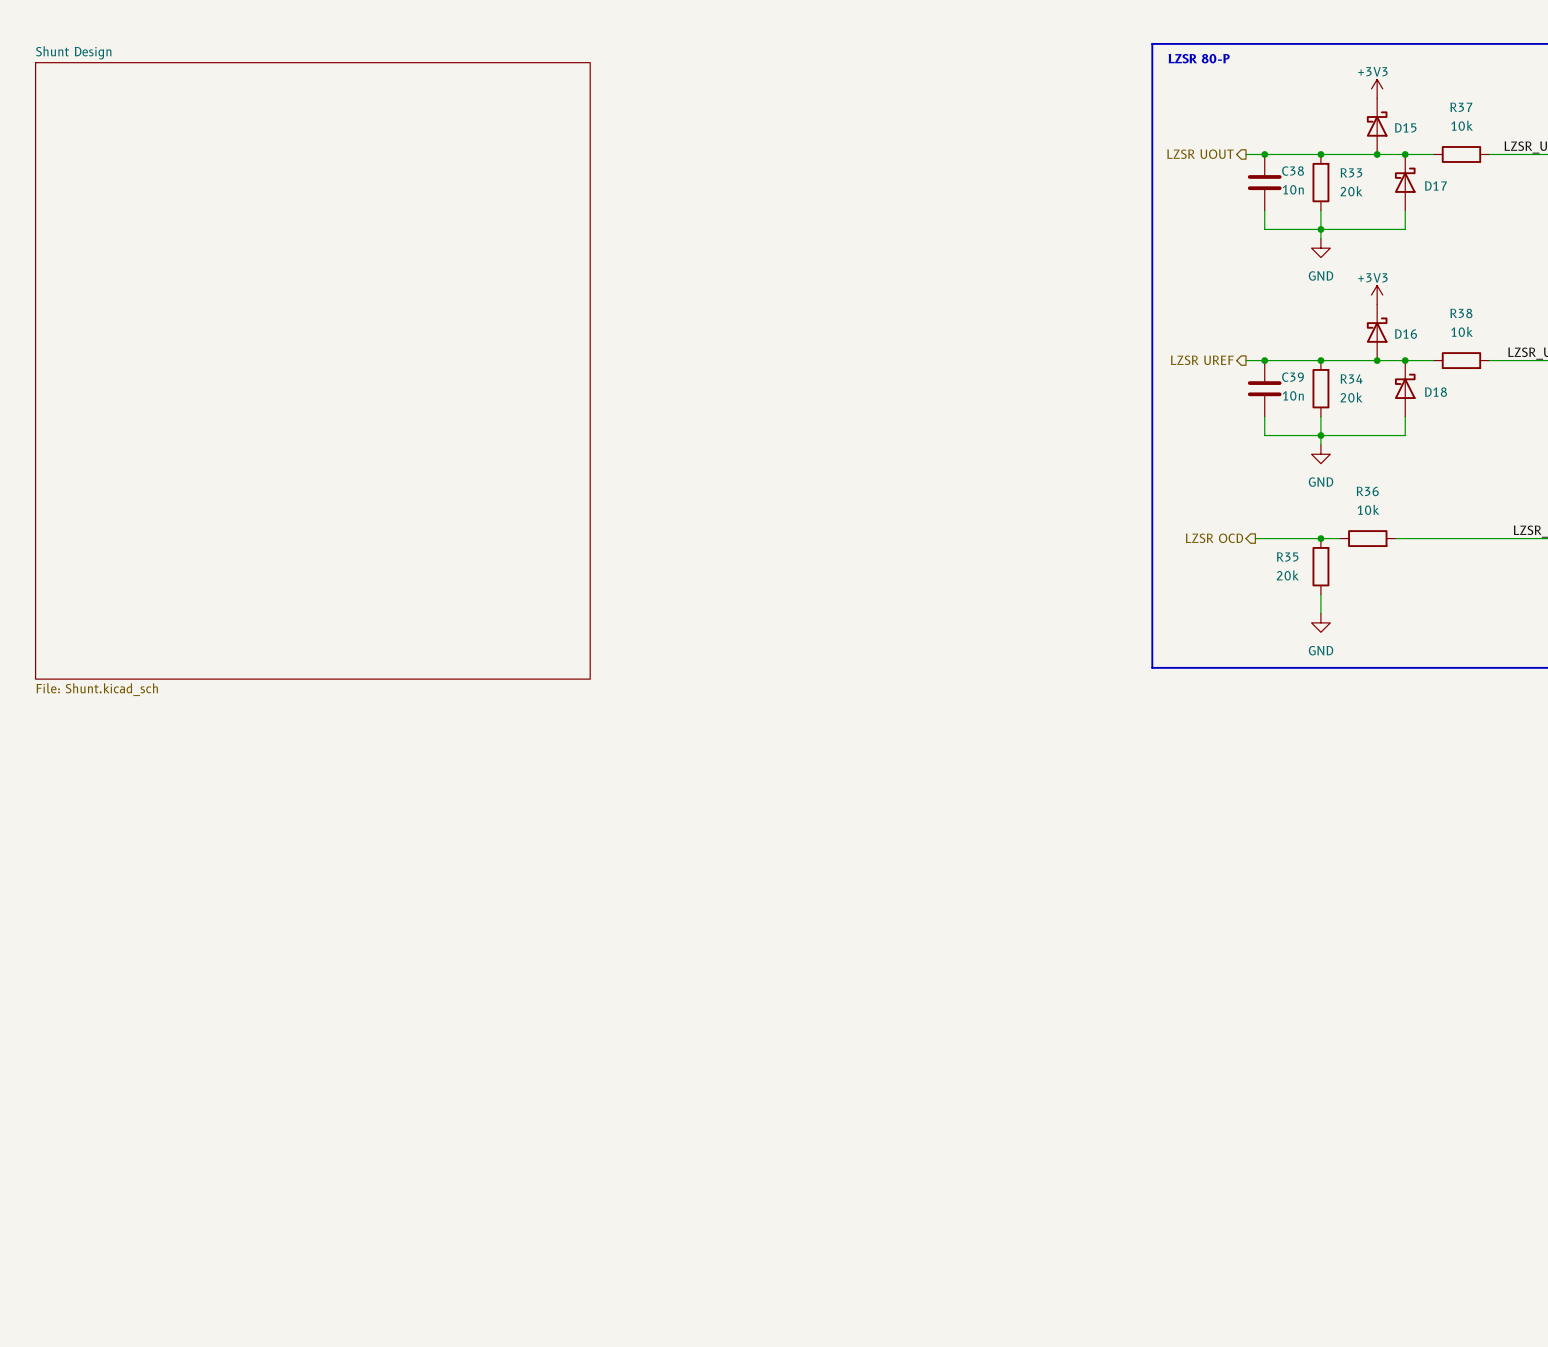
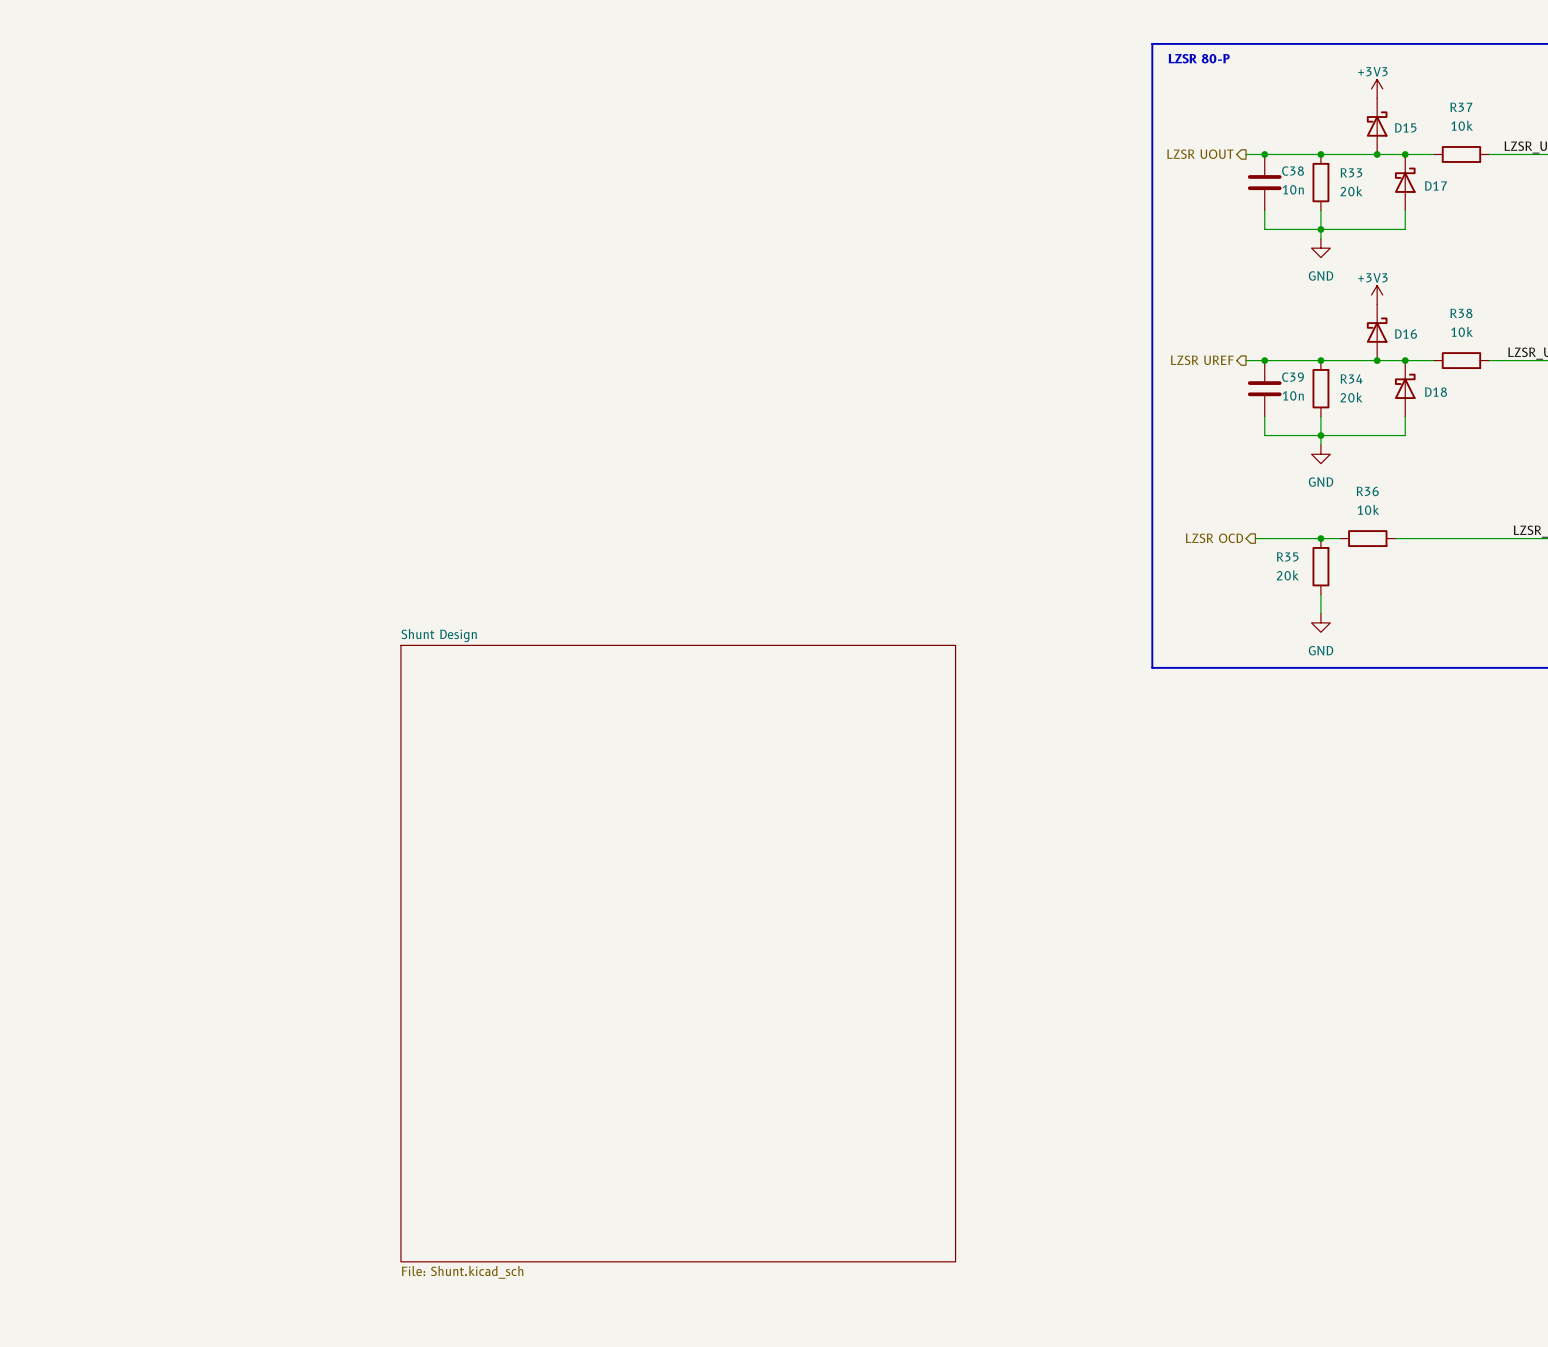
sheet Shunt Design: File: Shunt.kicad_sch (312, 370) -> none
sheet Shunt Design: none -> File: Shunt.kicad_sch (678, 953)

